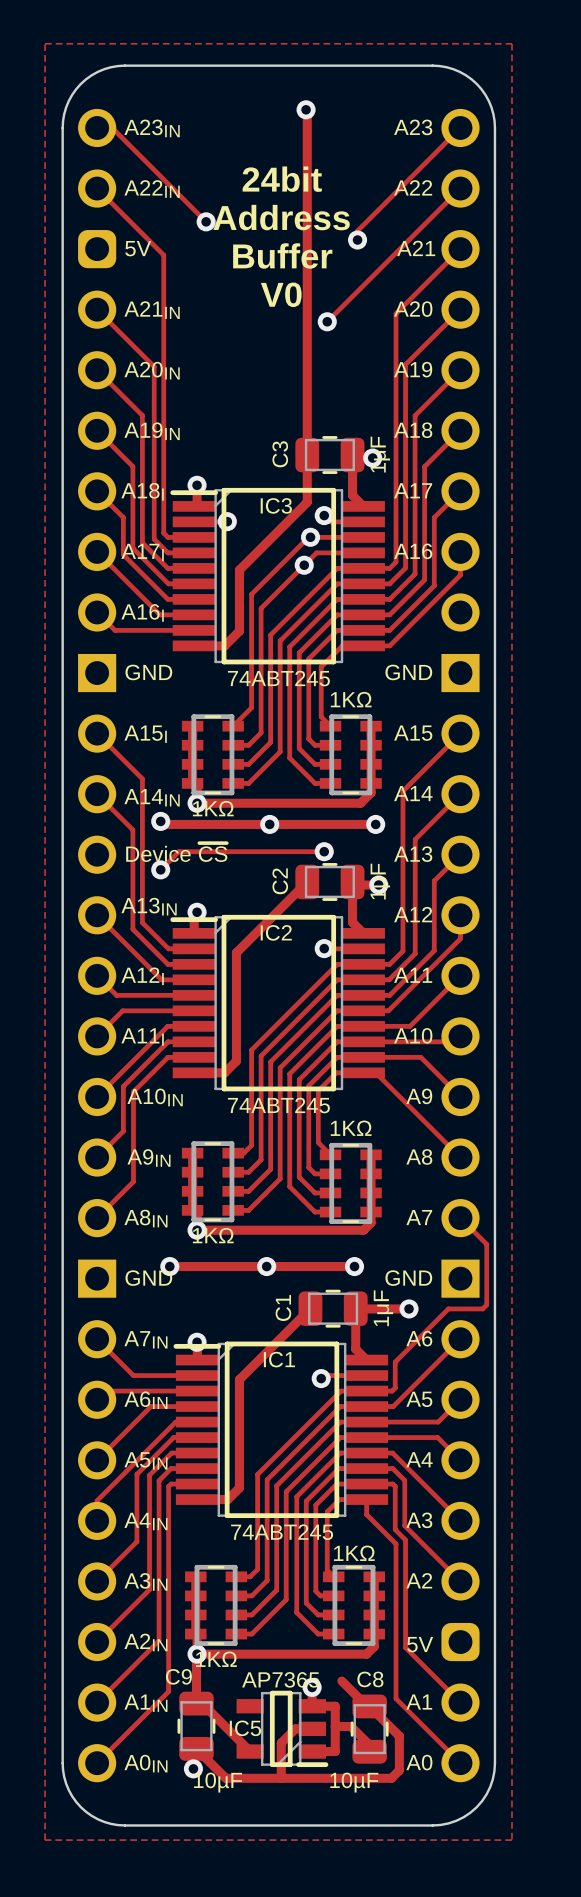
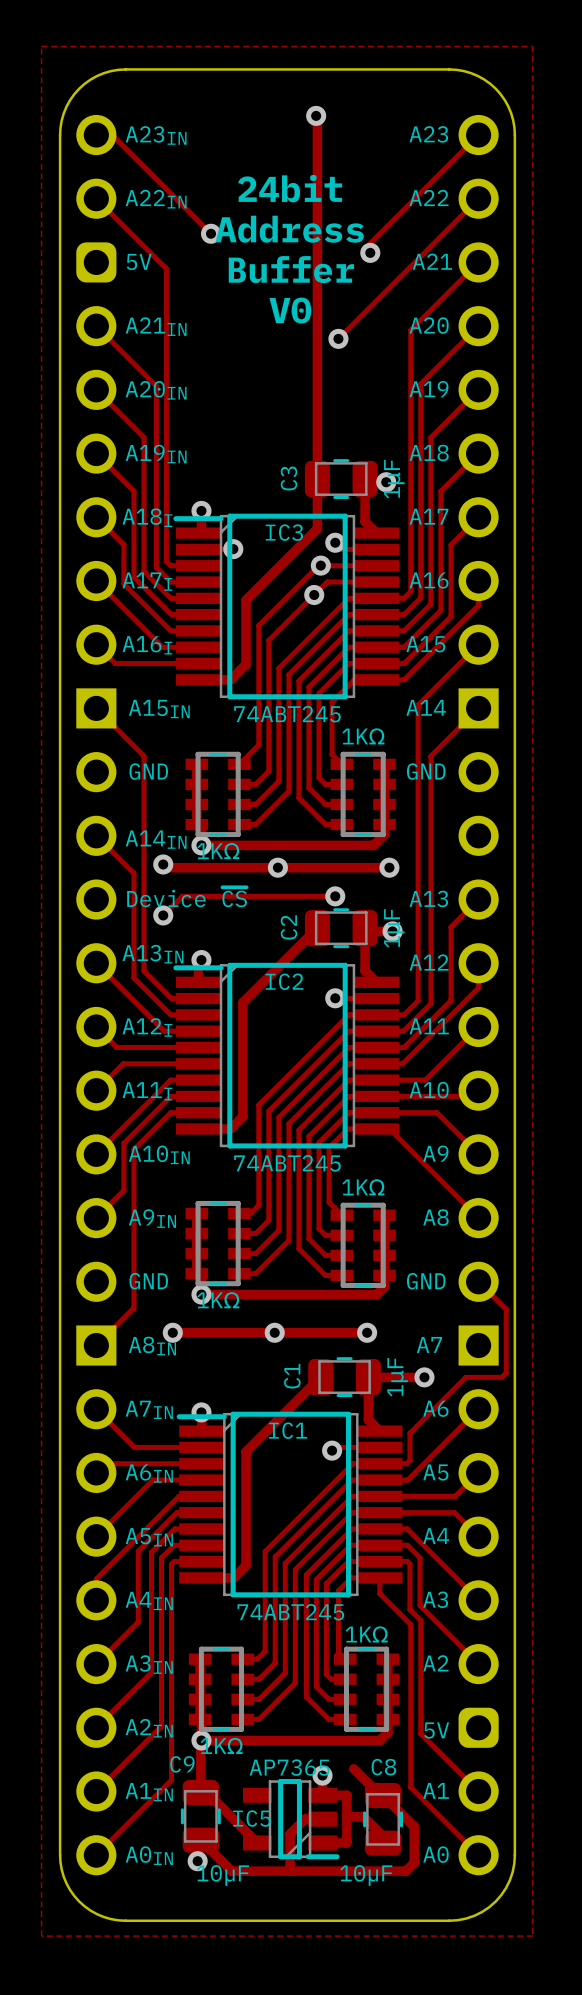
text position: GND (148, 672) -> GND (148, 771)
text position: GND (408, 672) -> GND (426, 771)
text: none -> A15IN (159, 709)
track: (97, 733) (142, 778) -> (96, 708) (144, 756) (144, 819)
text position: A15 (413, 733) -> A15 (425, 644)
track: (460, 733) (402, 791) -> (478, 644) (418, 705) (418, 832)
text: A15I (145, 734) -> none
text position: A14 (413, 793) -> A14 (426, 707)
track: (460, 794) (415, 839) -> (478, 708) (430, 756) (430, 883)
track: (133, 1091) (133, 1181) (97, 1218) -> (134, 1148) (133, 1307) (96, 1345)
text position: A7 (419, 1217) -> A7 (429, 1344)
text position: A8IN (145, 1218) -> A8IN (152, 1345)
text position: GND (148, 1278) -> GND (148, 1281)
text position: GND (408, 1278) -> GND (426, 1281)

